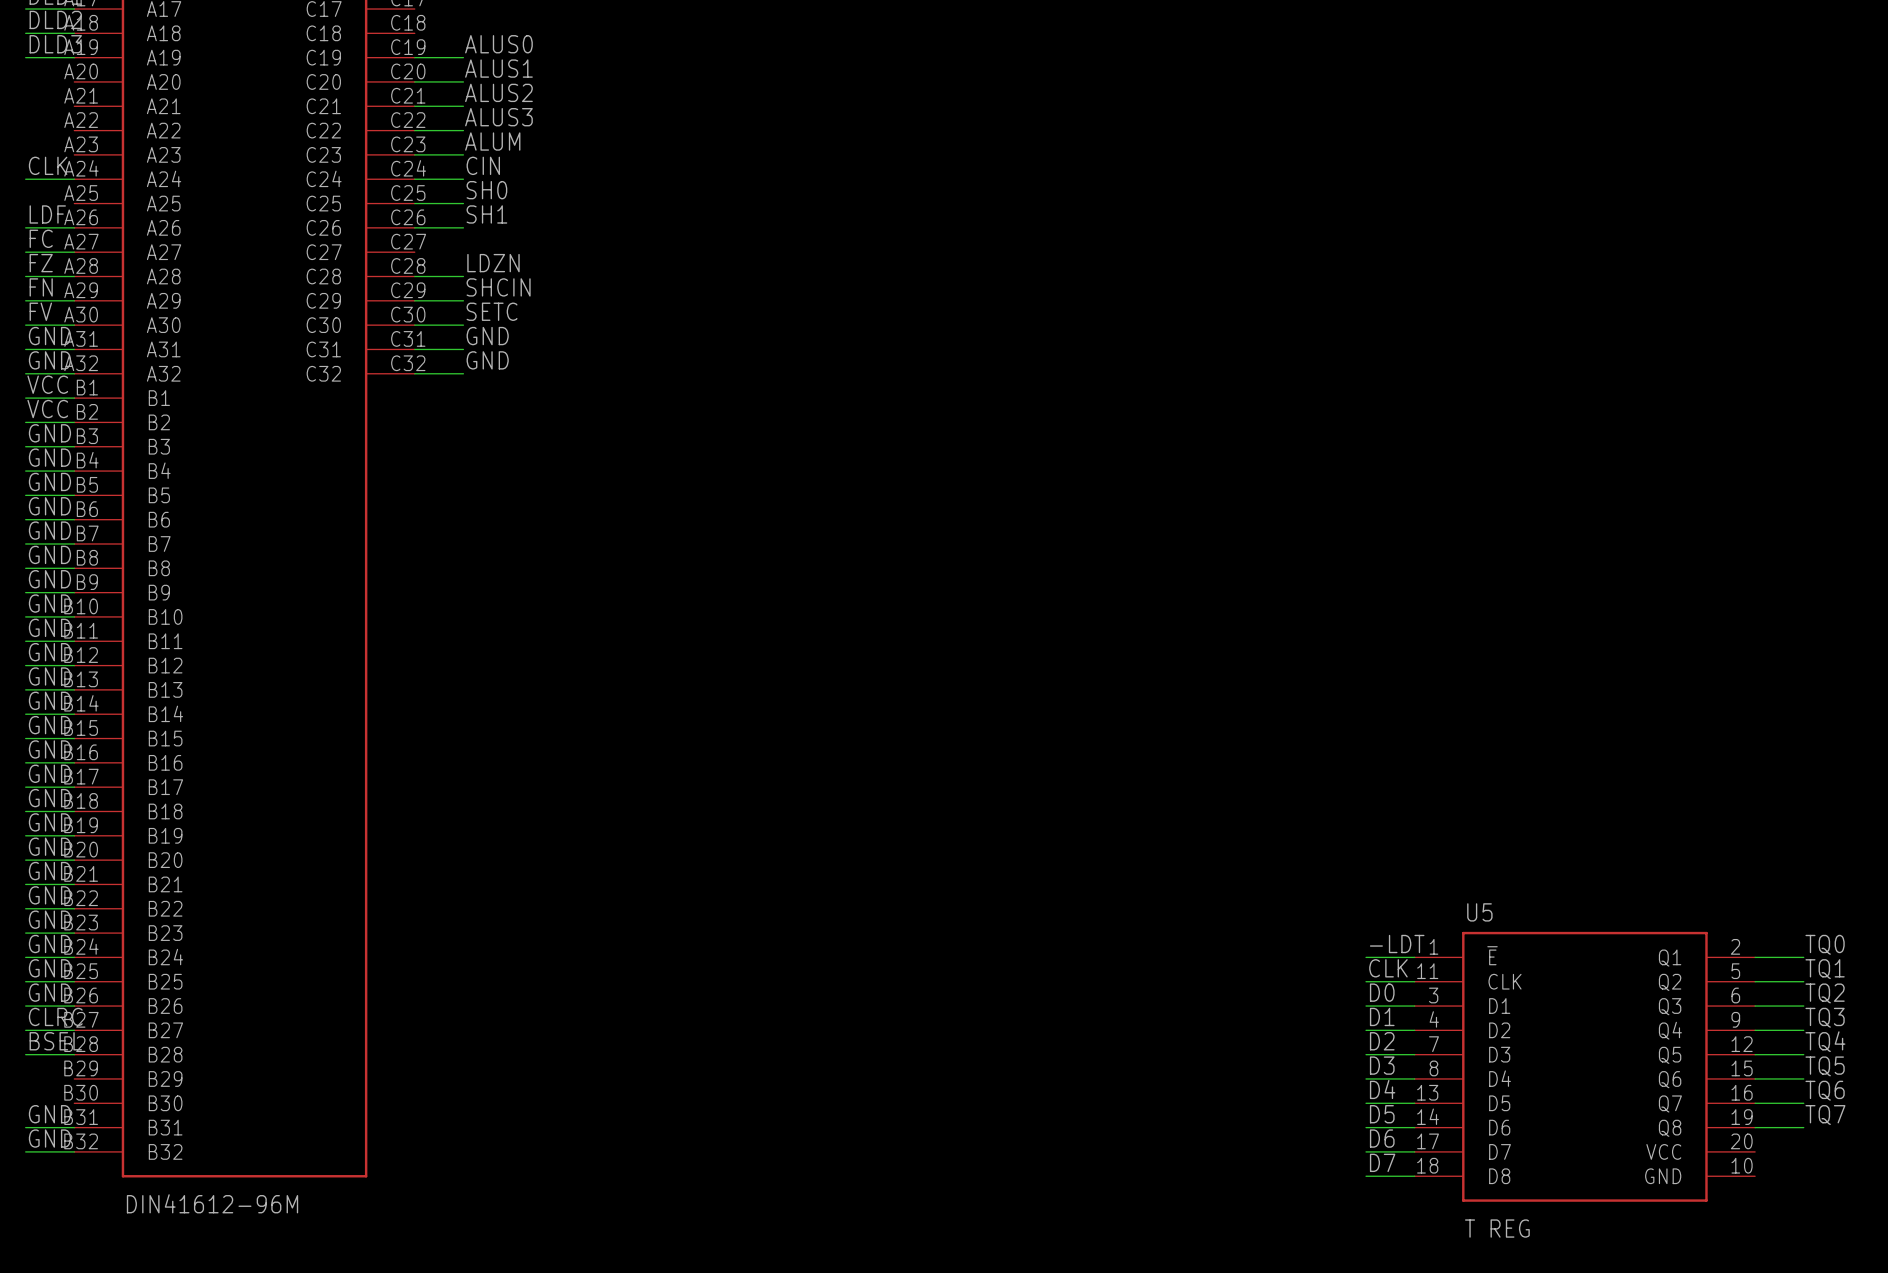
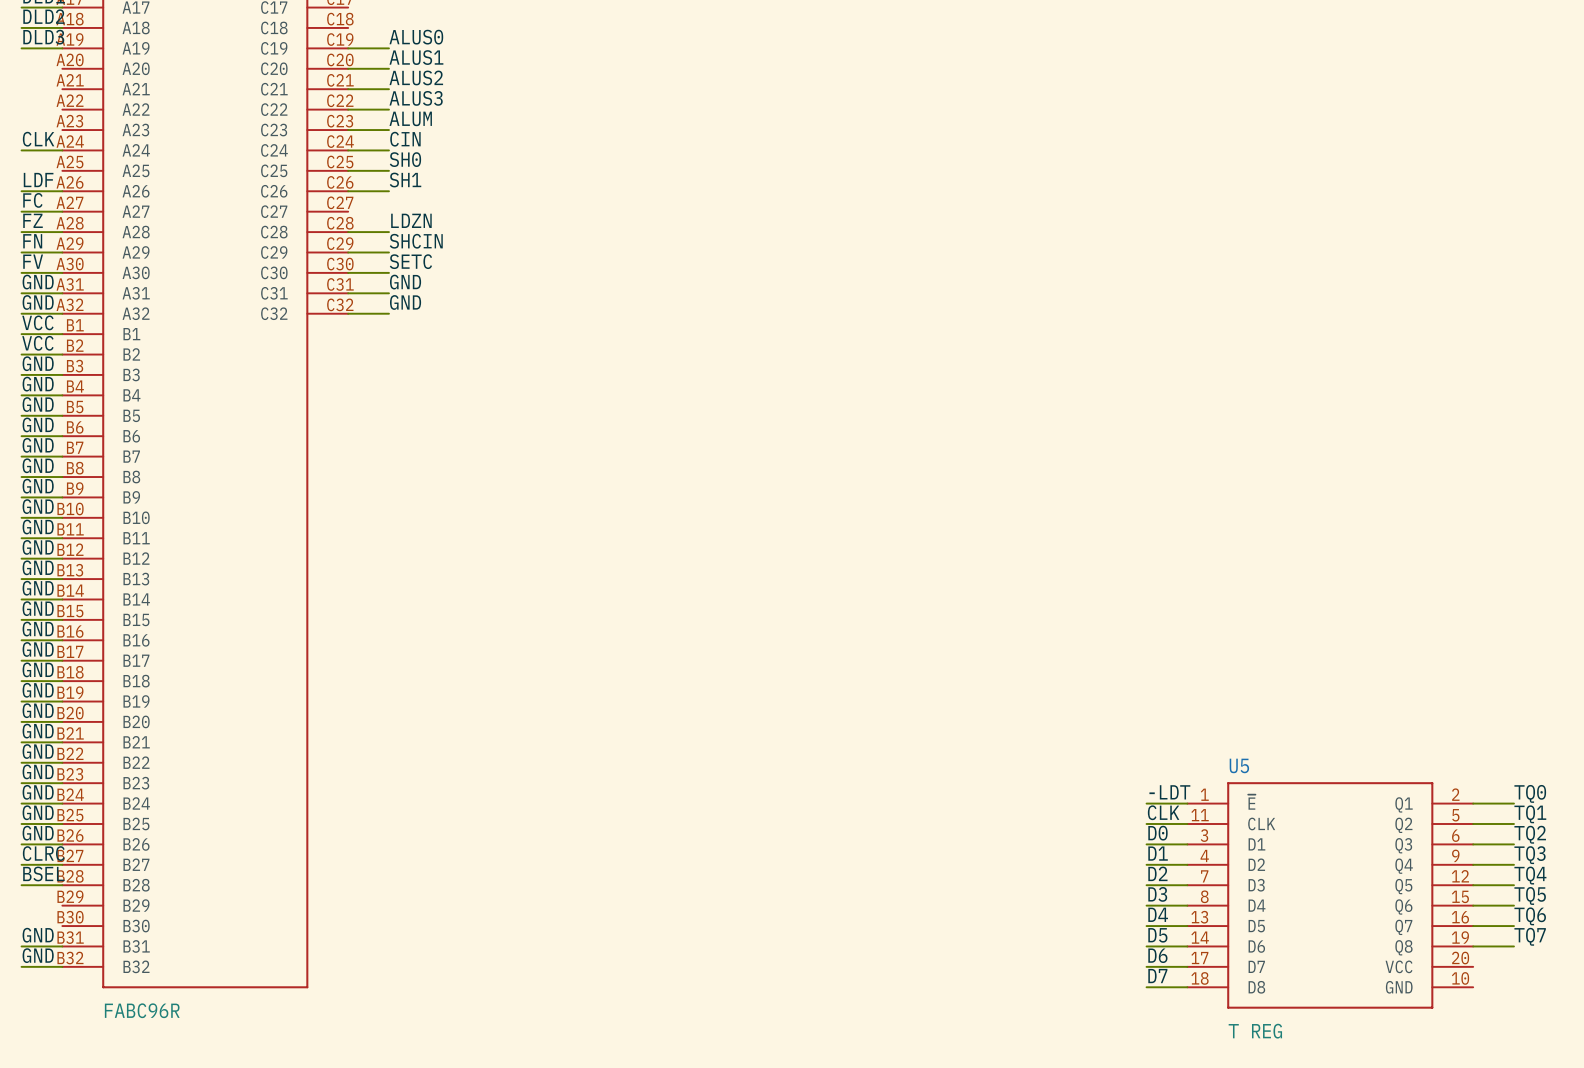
part value: DIN41612-96M (212, 1203) -> FABC96R (142, 1010)

